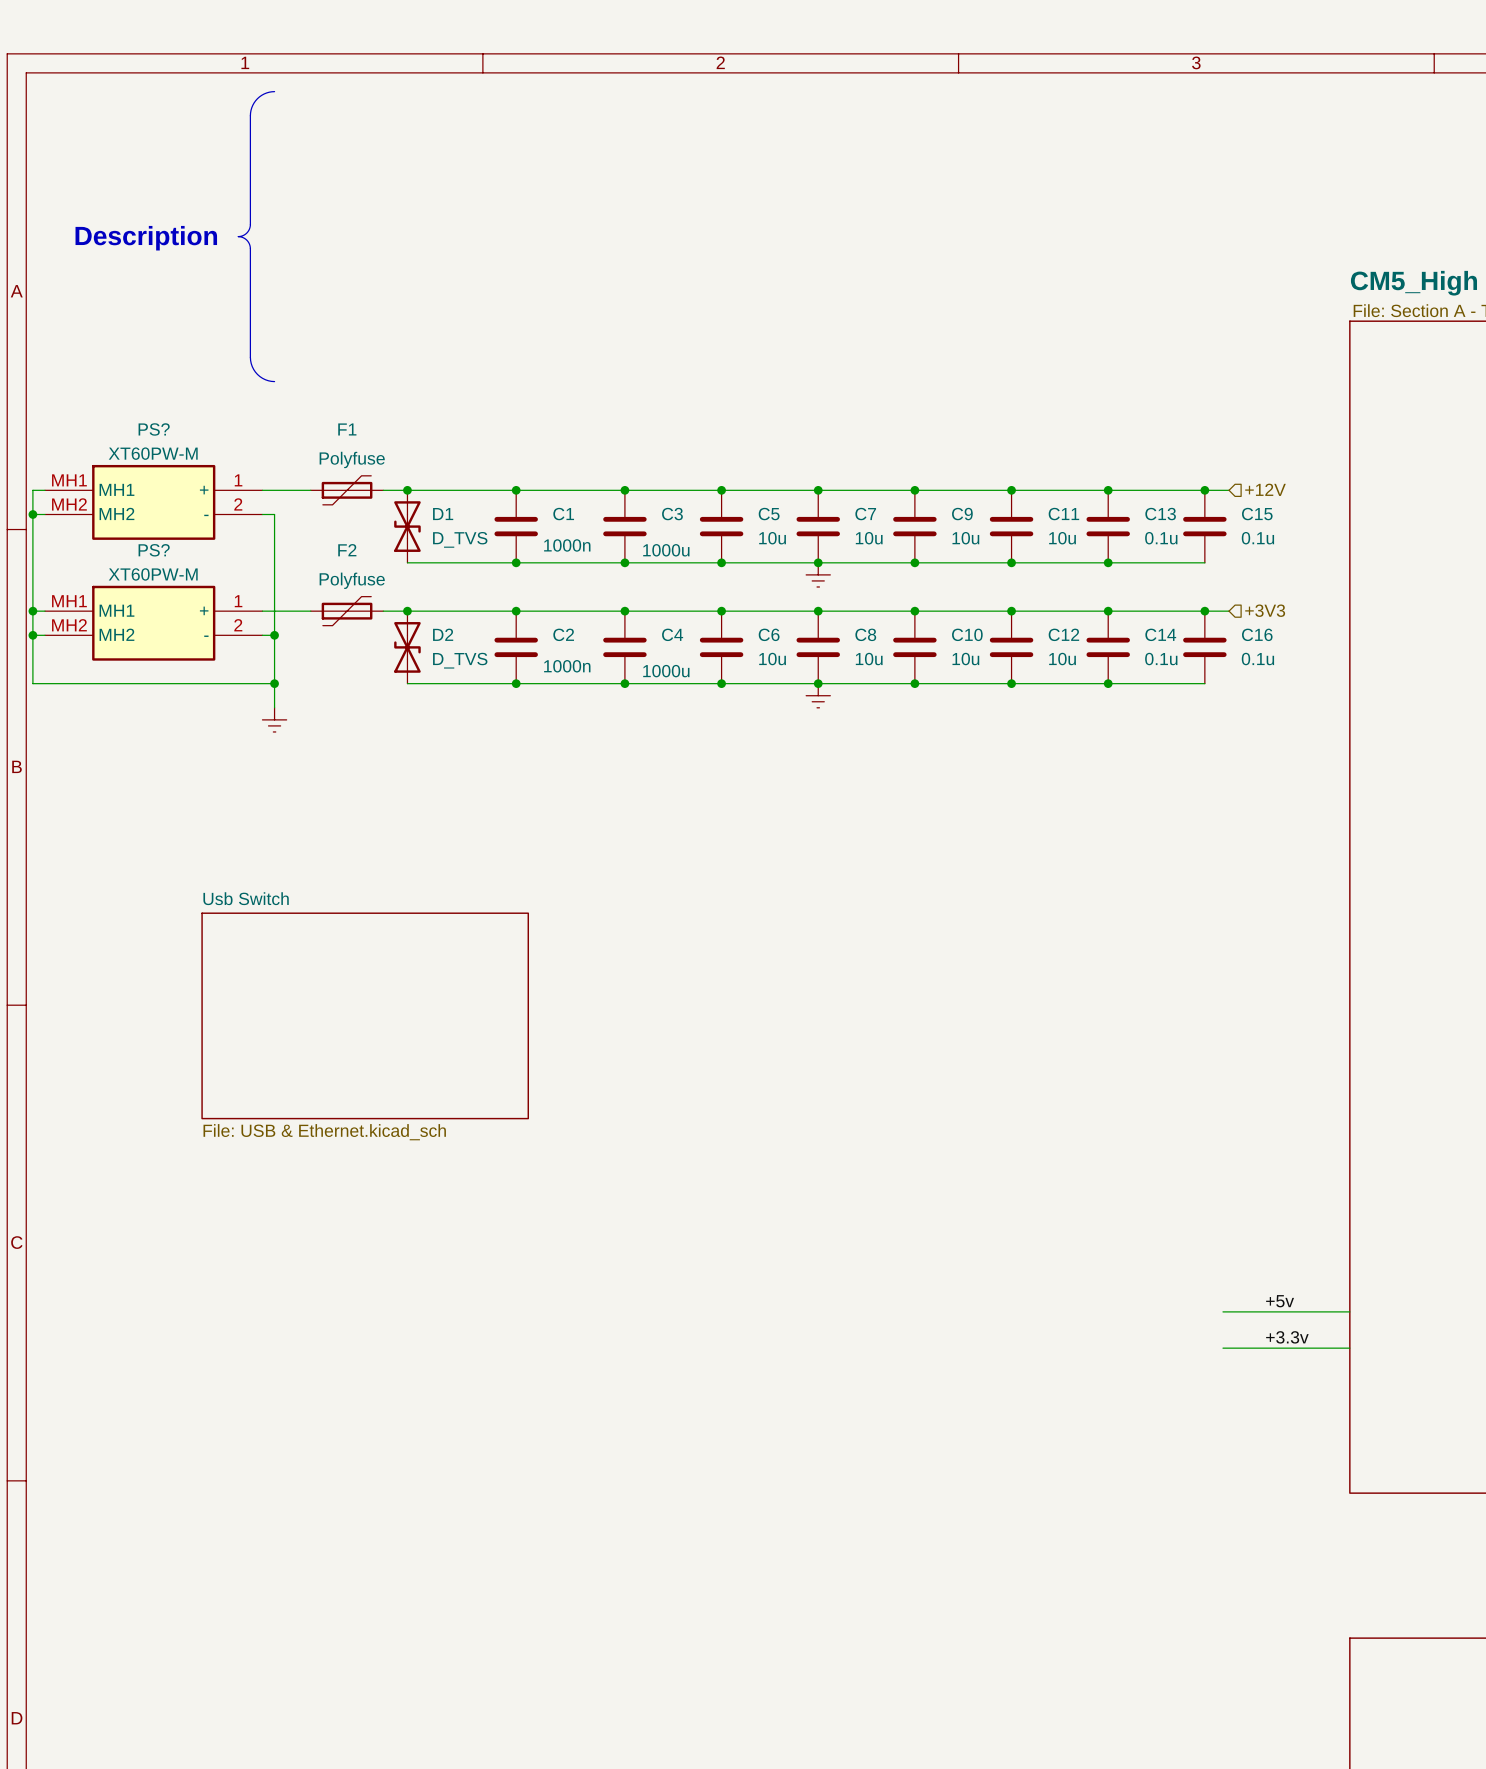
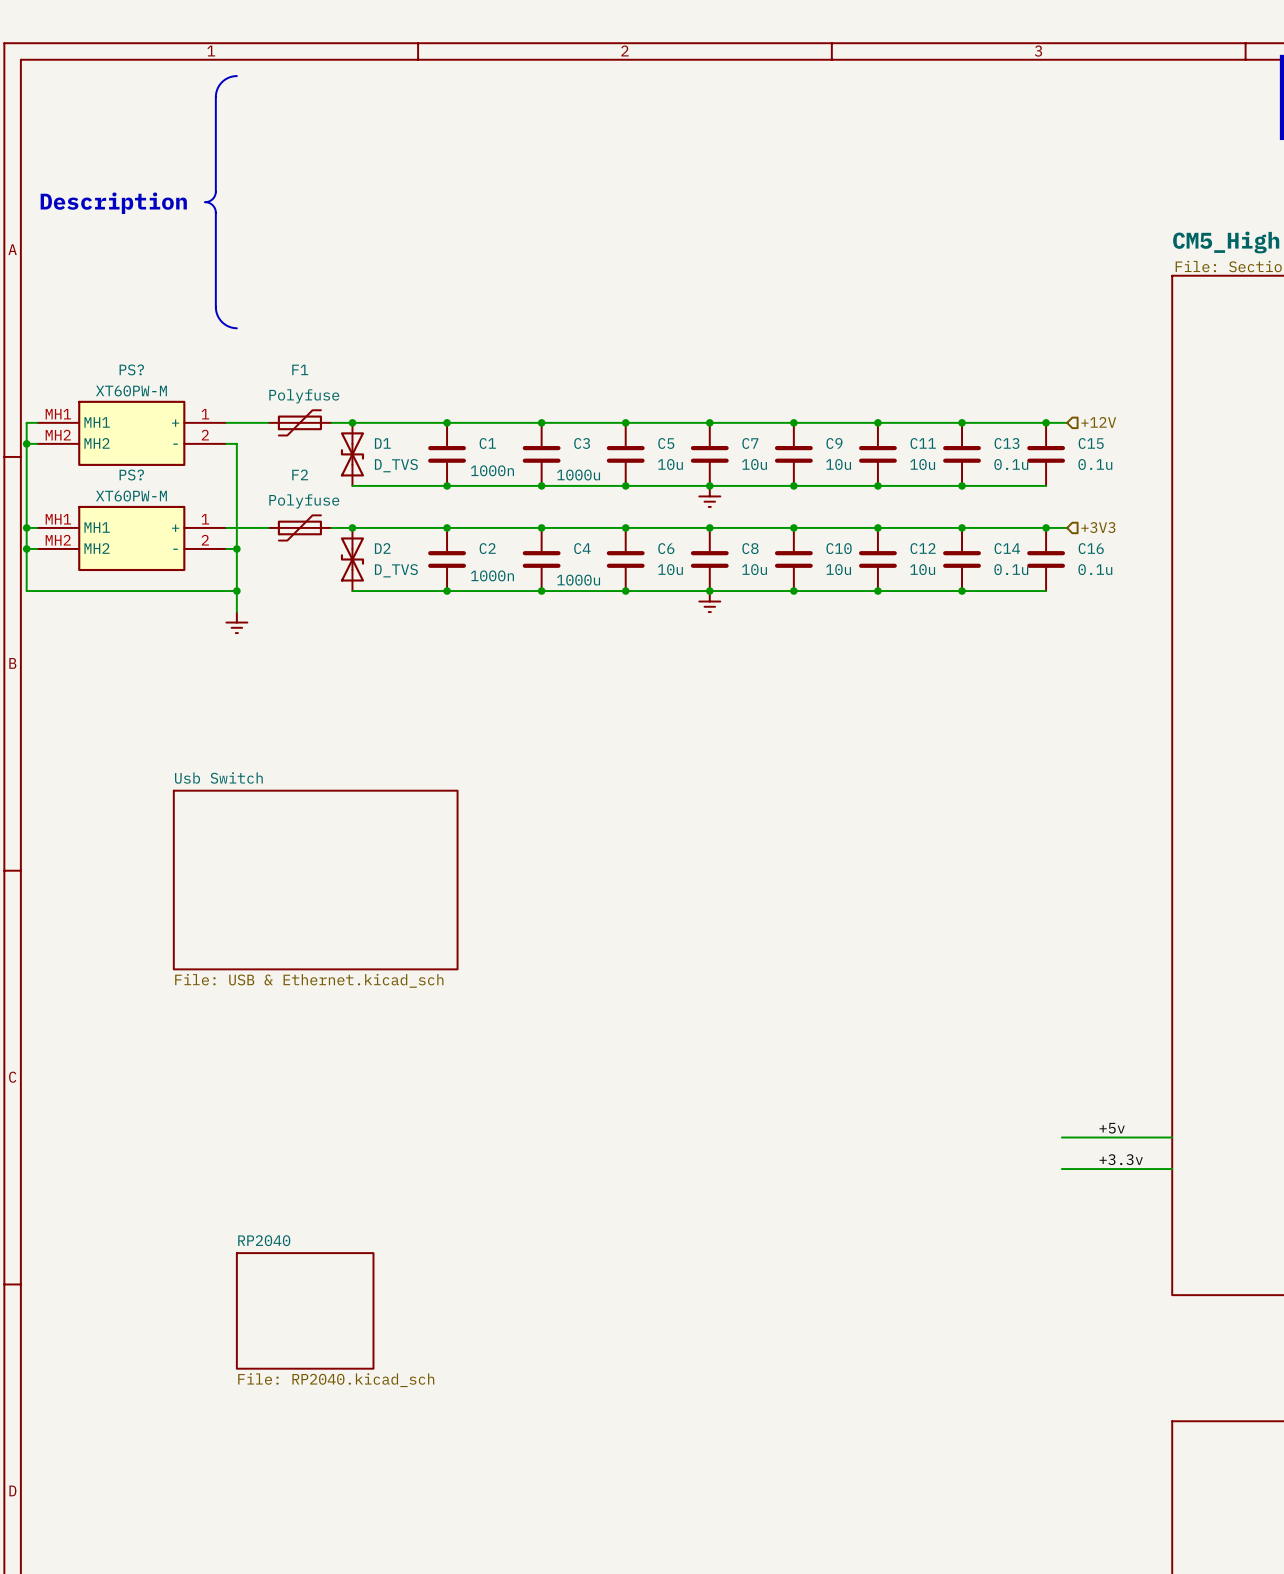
sheet RP2040: none -> File: RP2040.kicad_sch (305, 1310)

